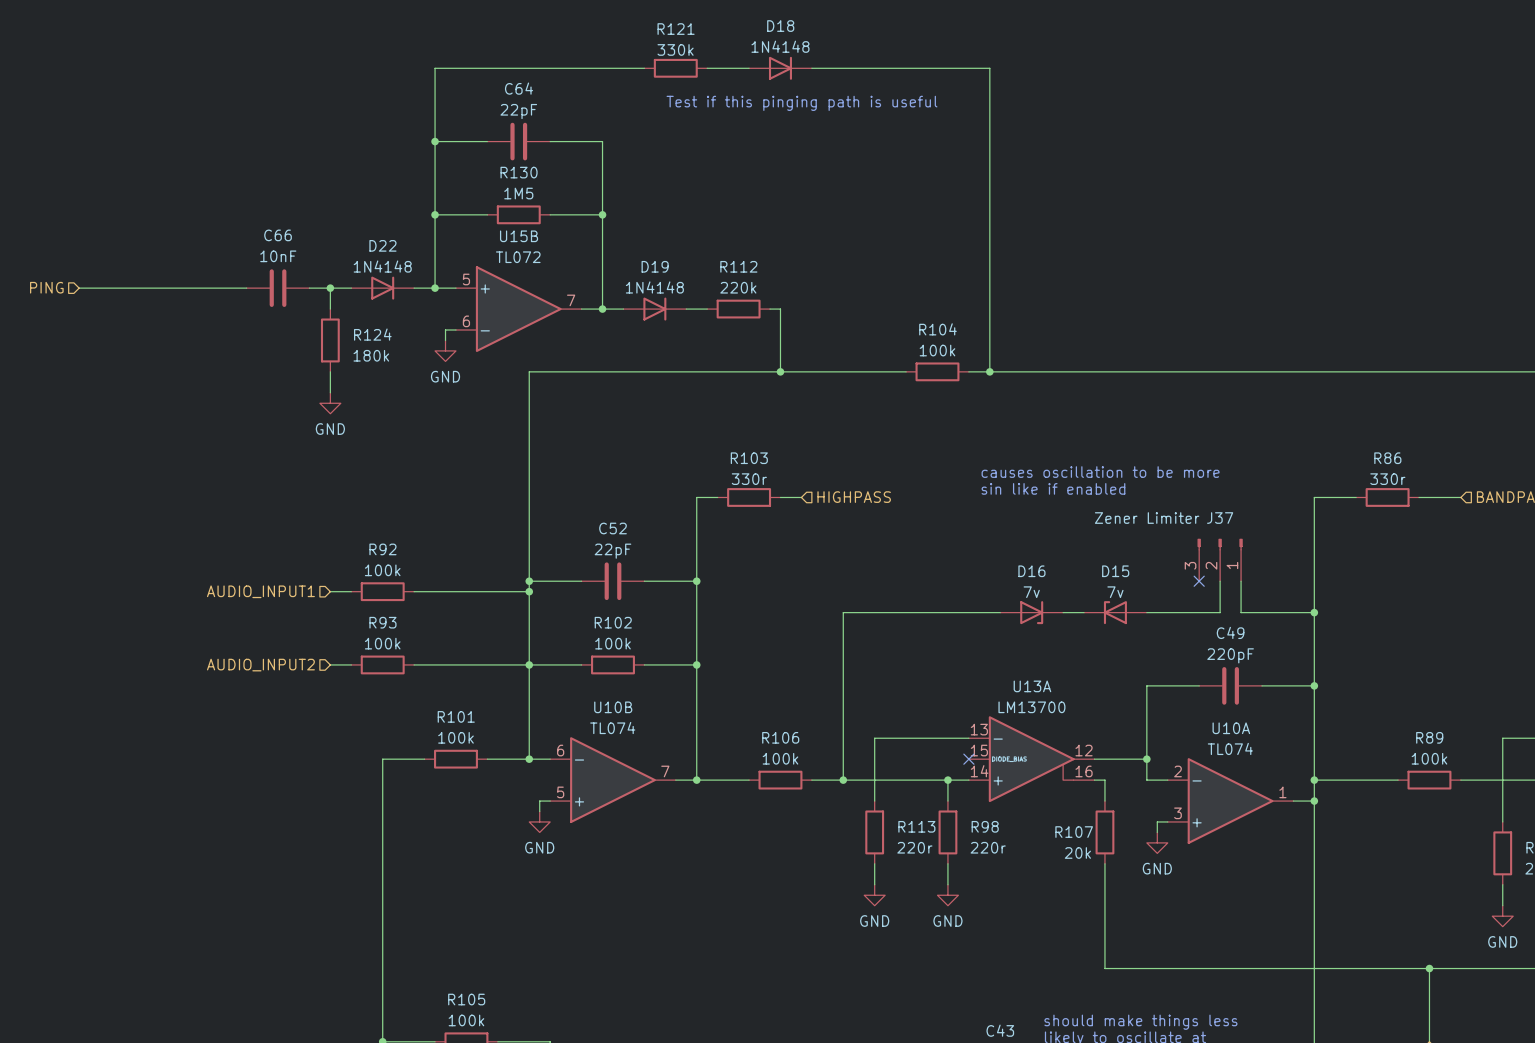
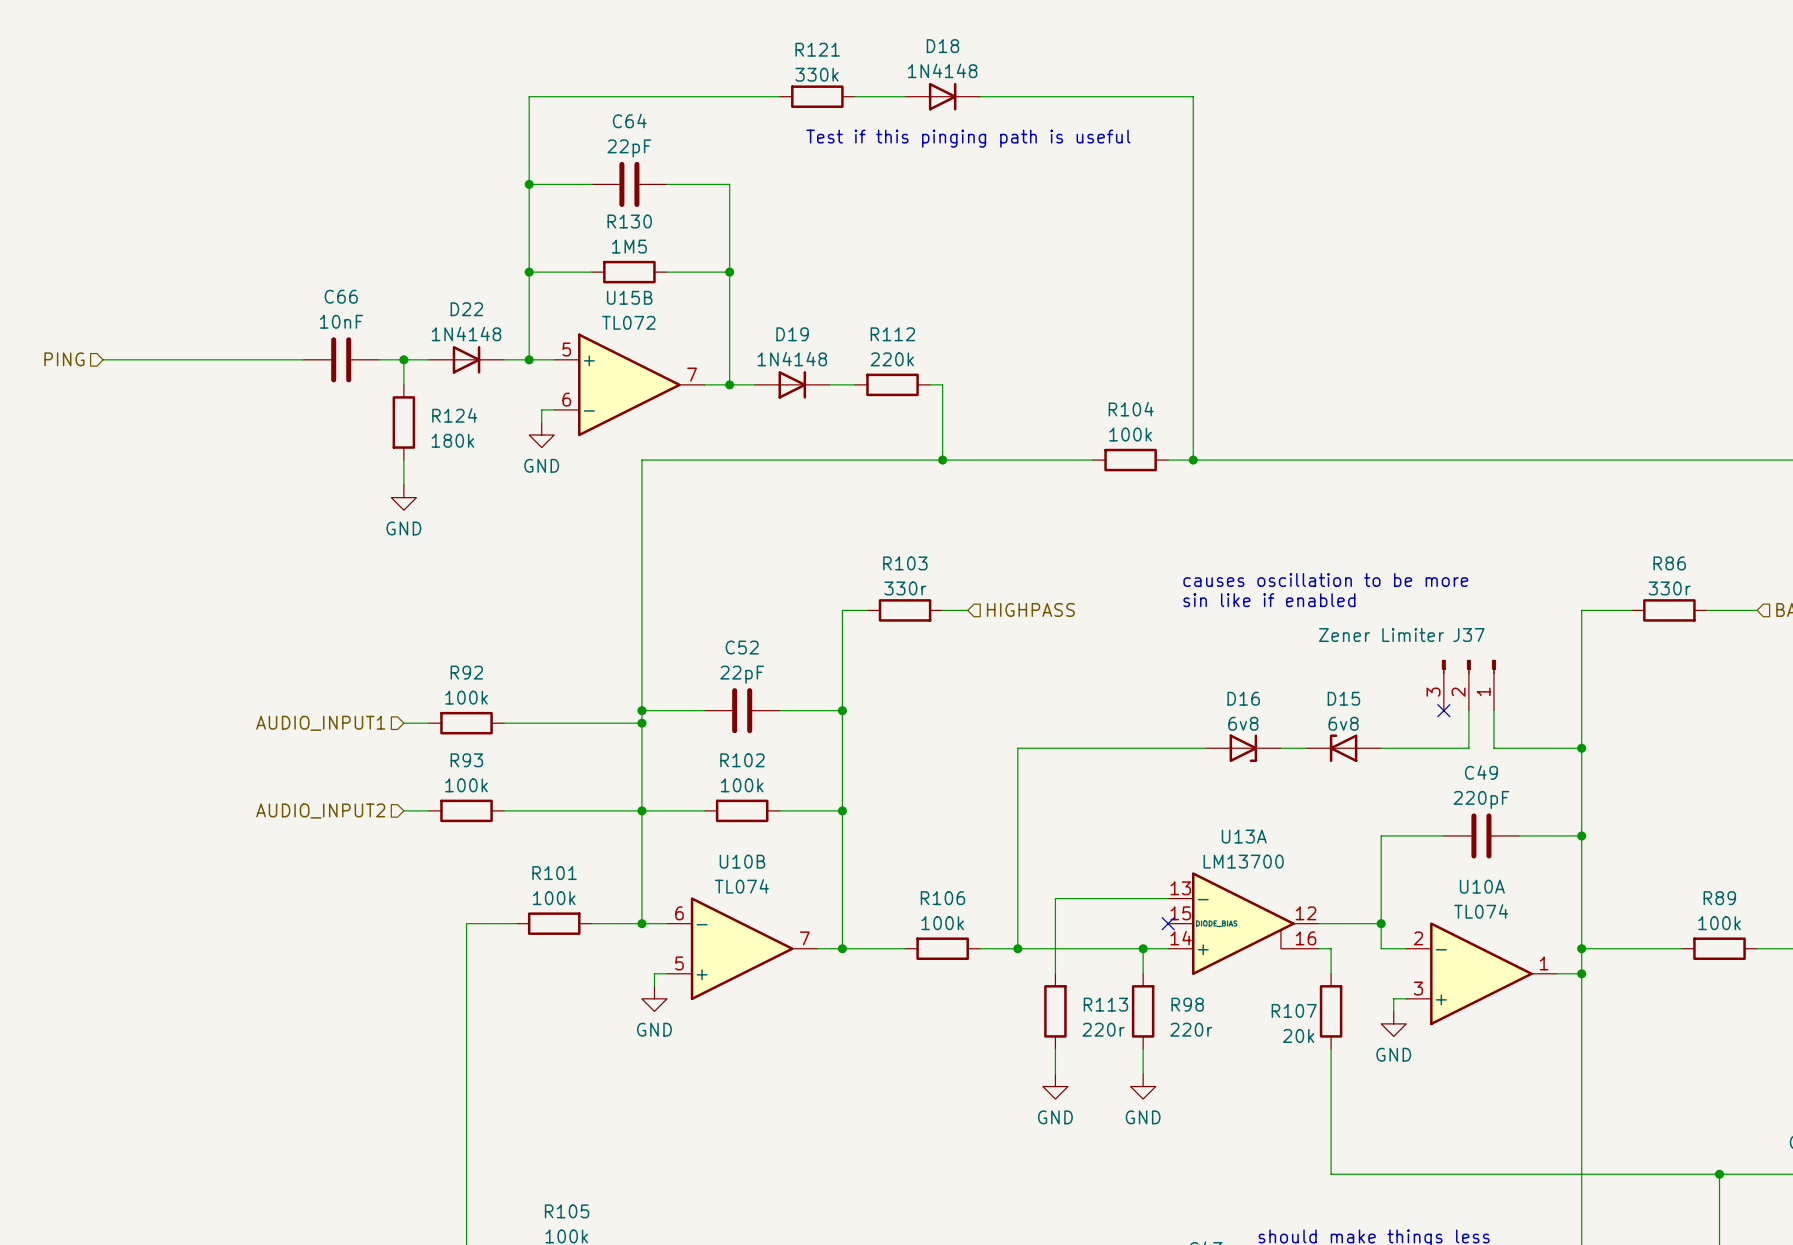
D16 value: 7v (1031, 592) -> 6v8 (1243, 723)
D15 value: 7v (1115, 592) -> 6v8 (1343, 723)

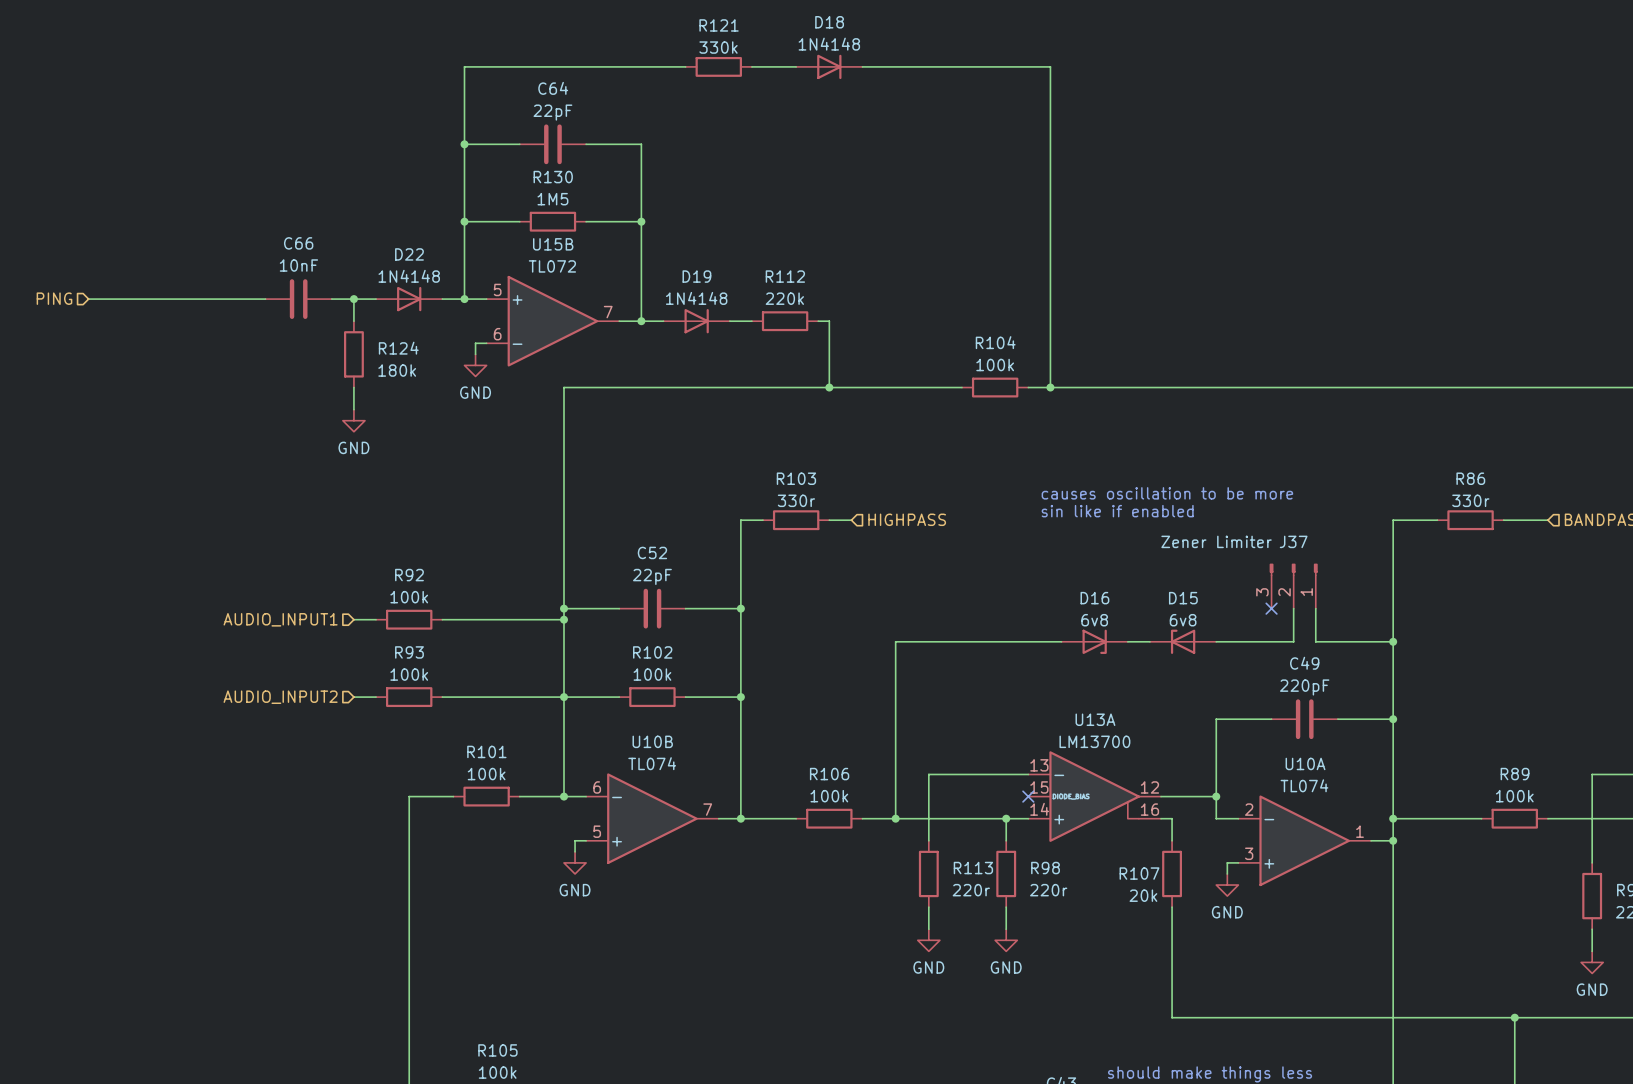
text: Test if this pinging path is useful (968, 138) -> none

